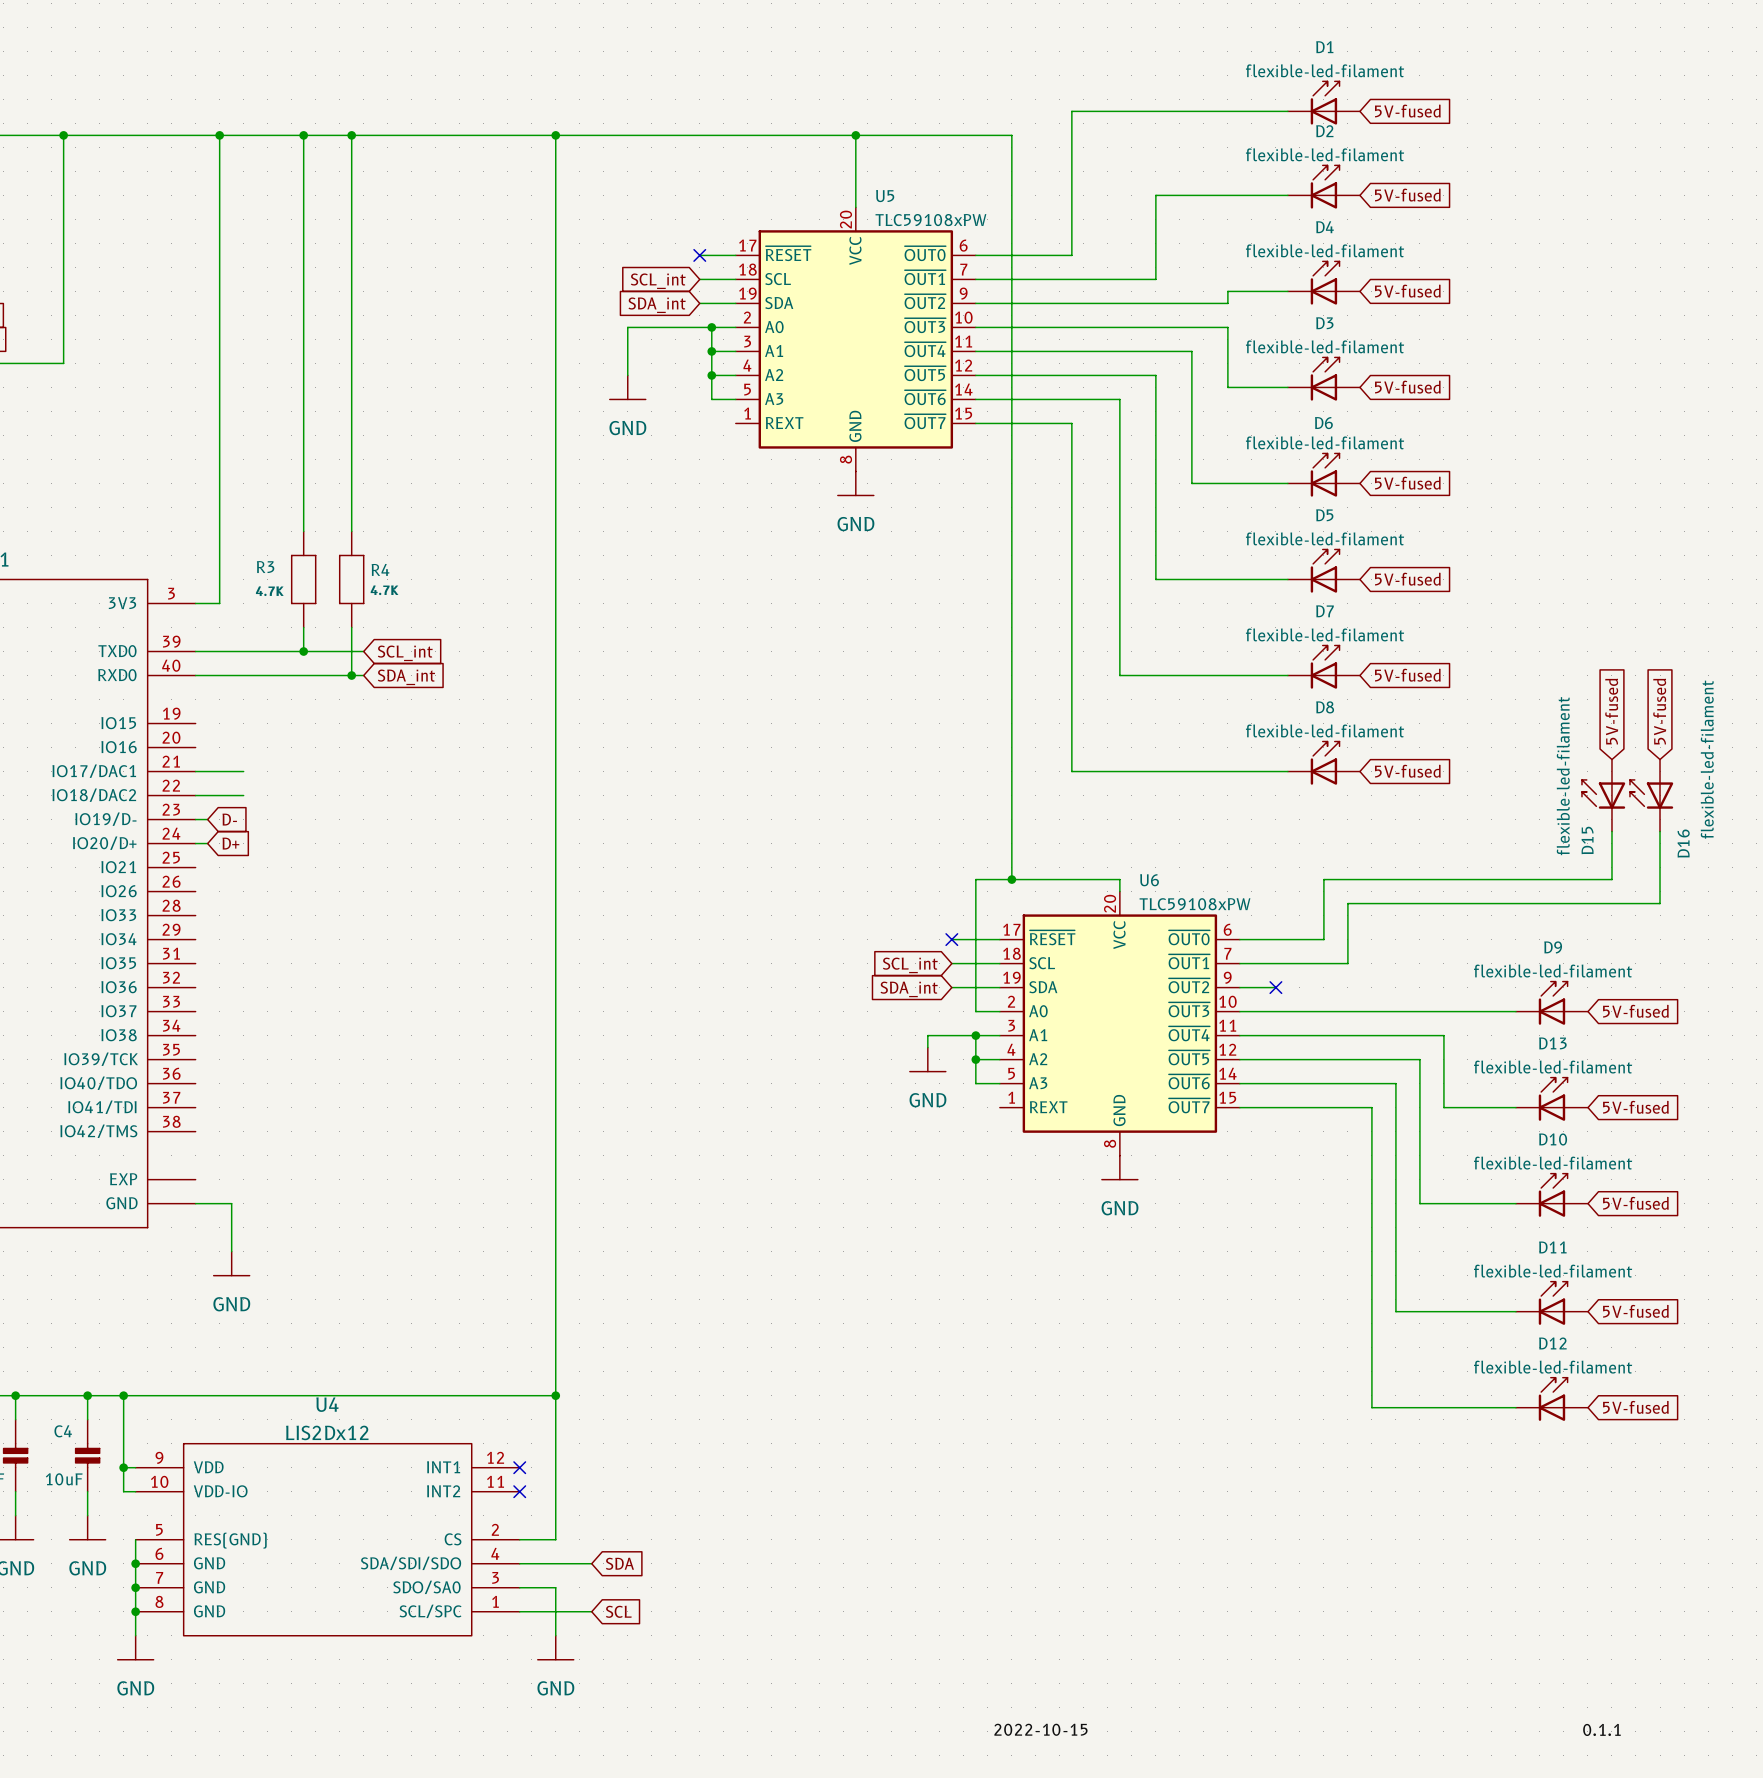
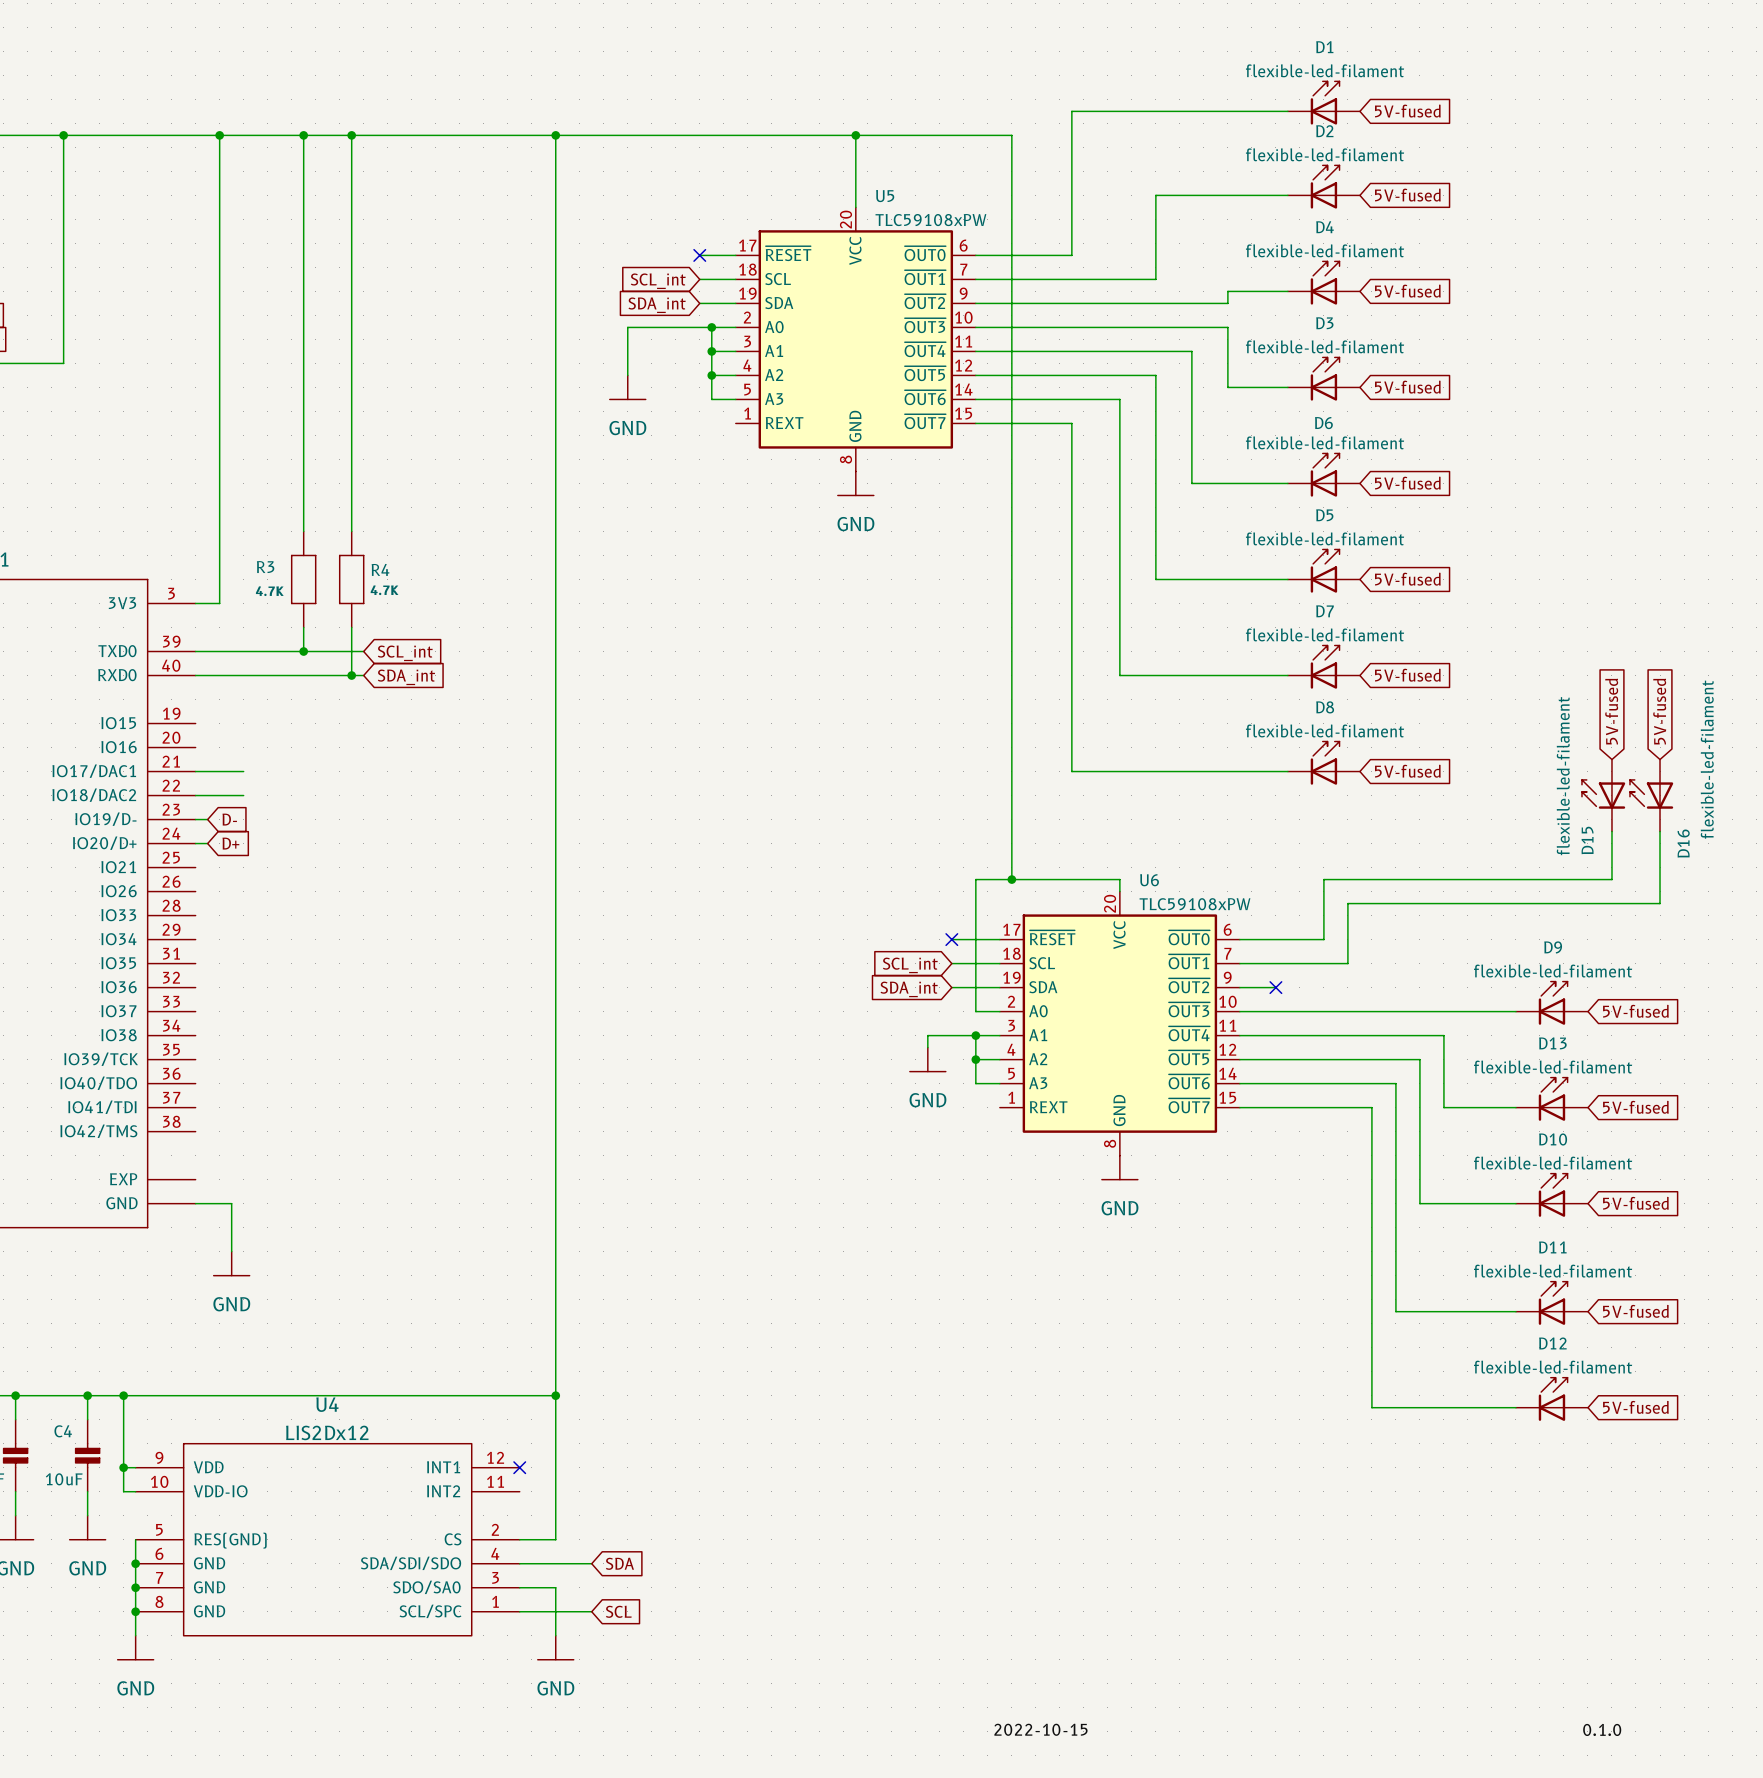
no-connect mark: (519, 1491) -> none
label: 0.1.1 (1601, 1729) -> 0.1.0 (1602, 1729)

